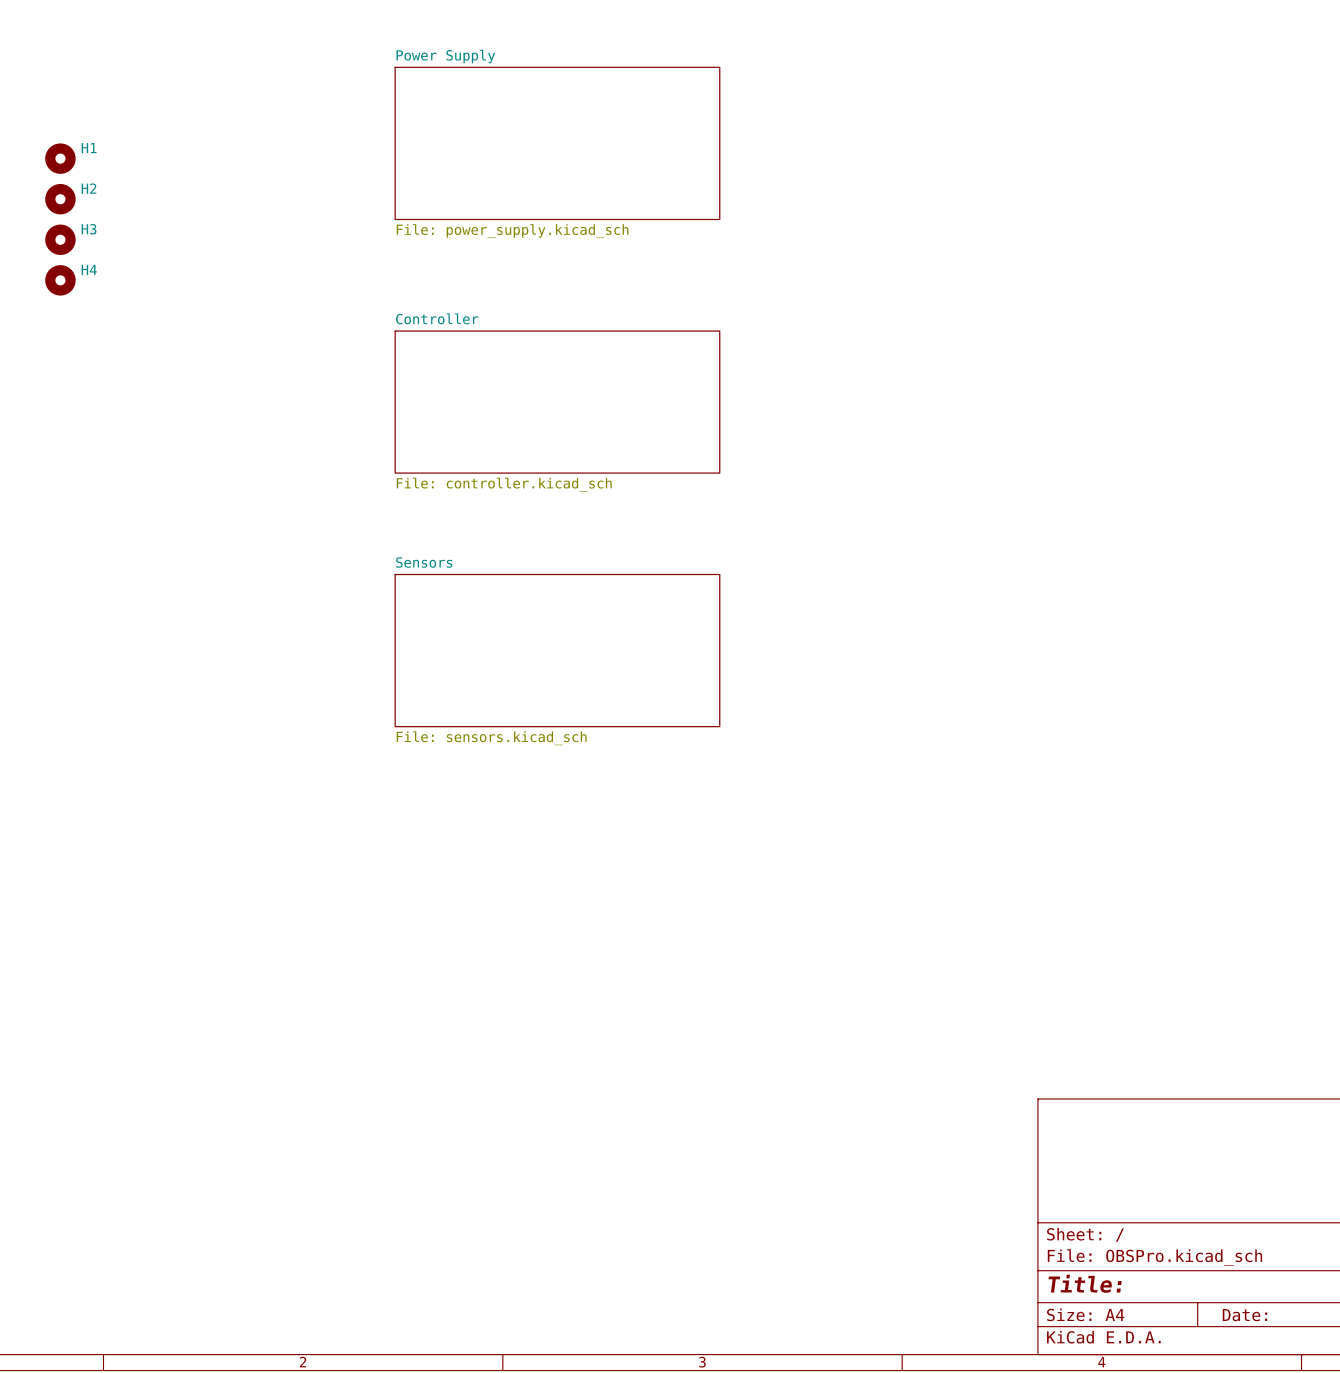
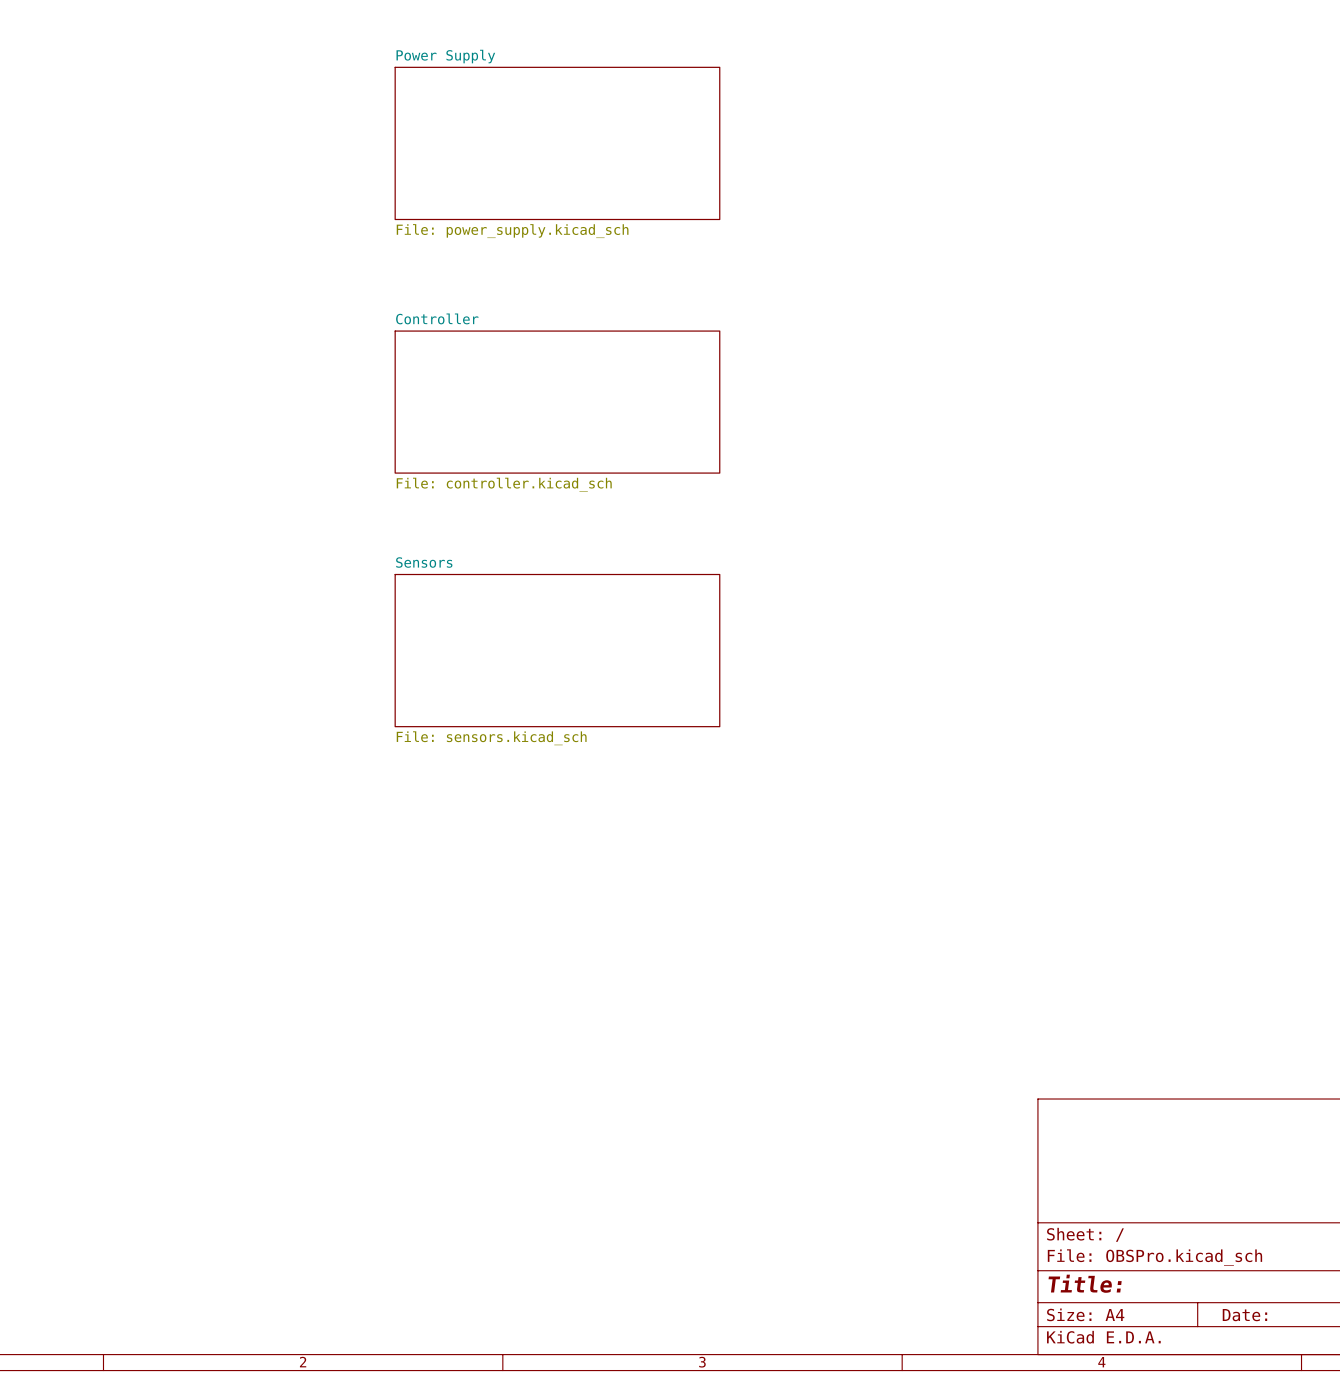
H1: (60, 158) -> none
H2: (60, 199) -> none
H3: (60, 239) -> none
H4: (60, 280) -> none

